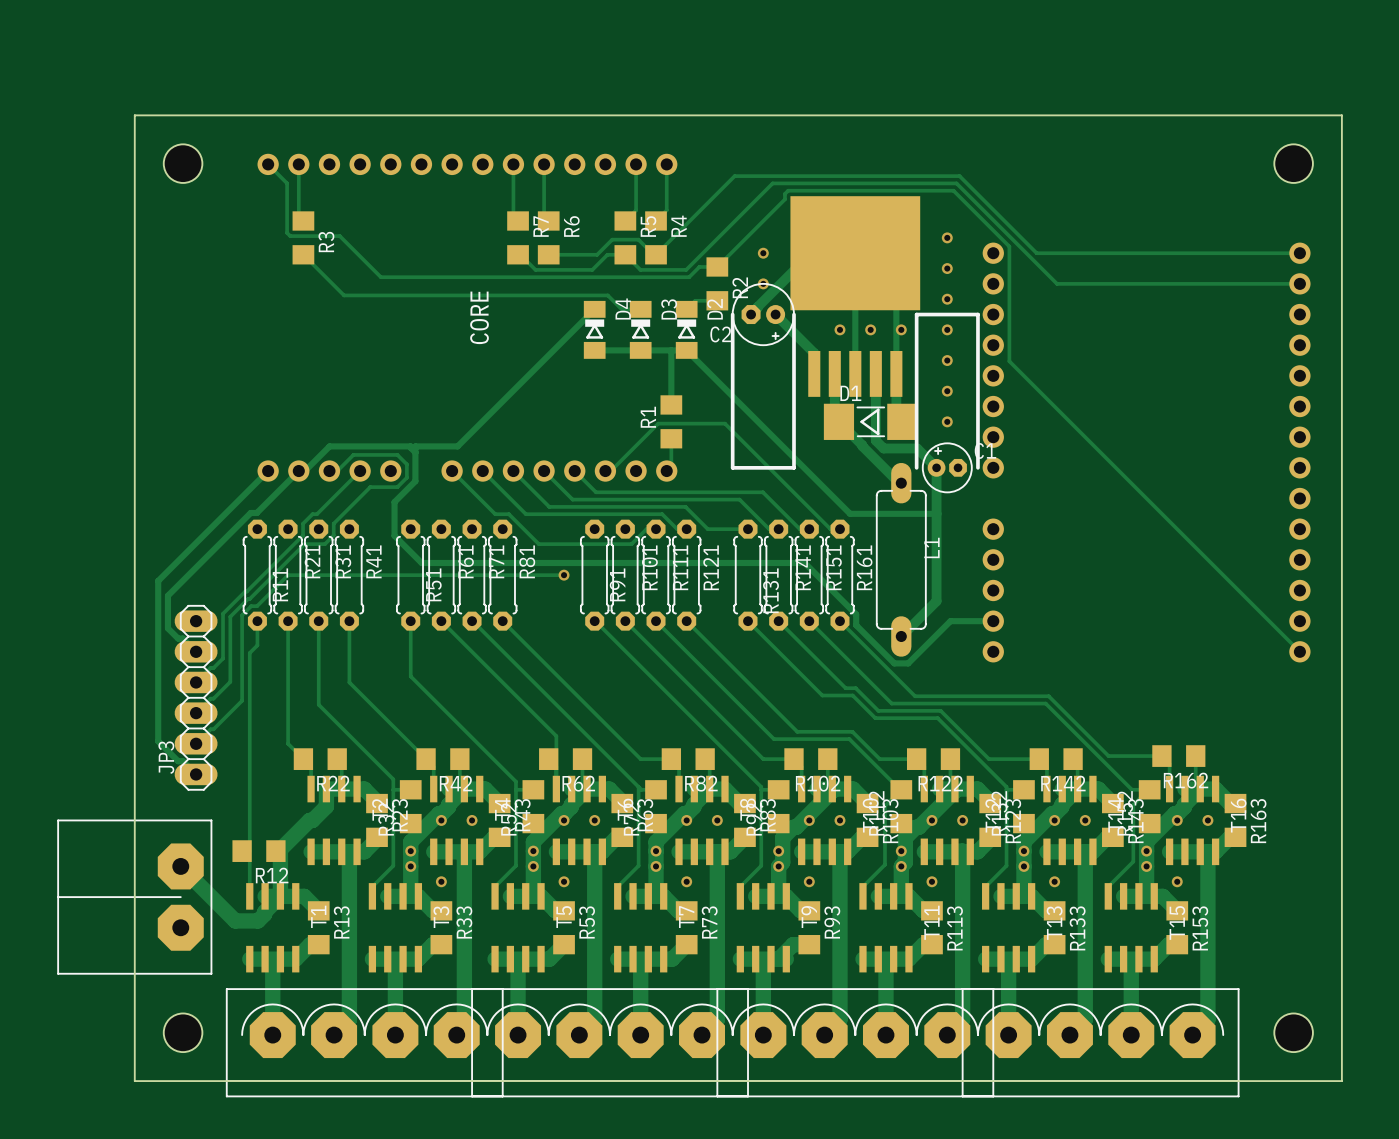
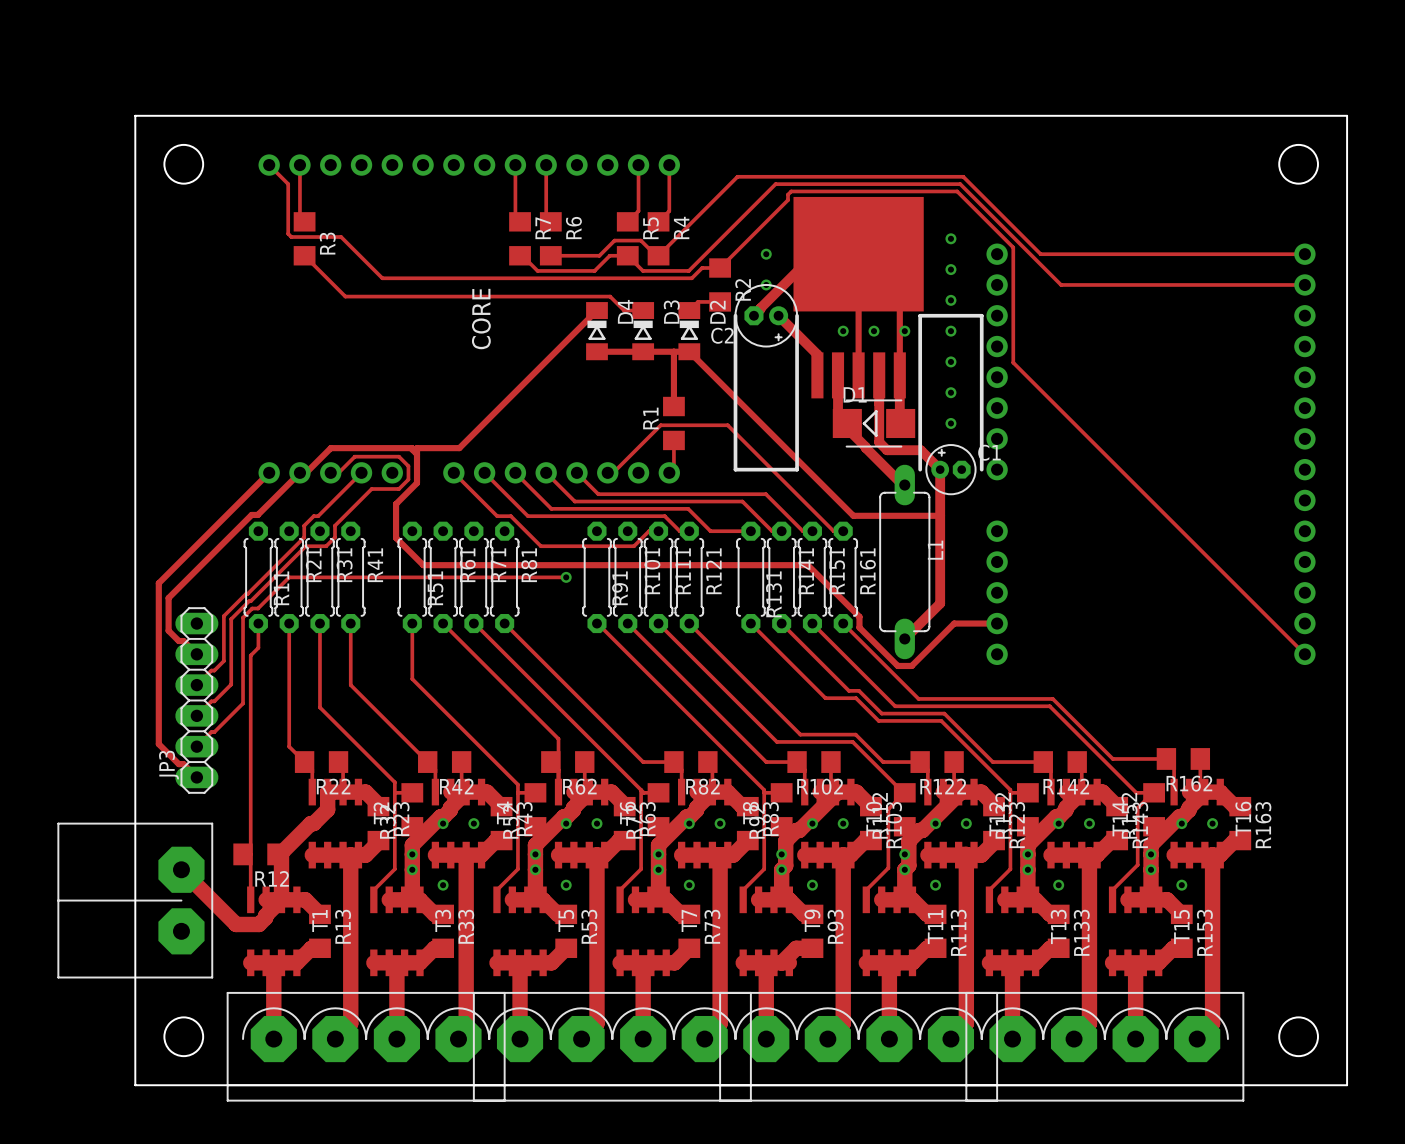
D1 footprint: [823, 403, 918, 440] -> [832, 399, 916, 448]

